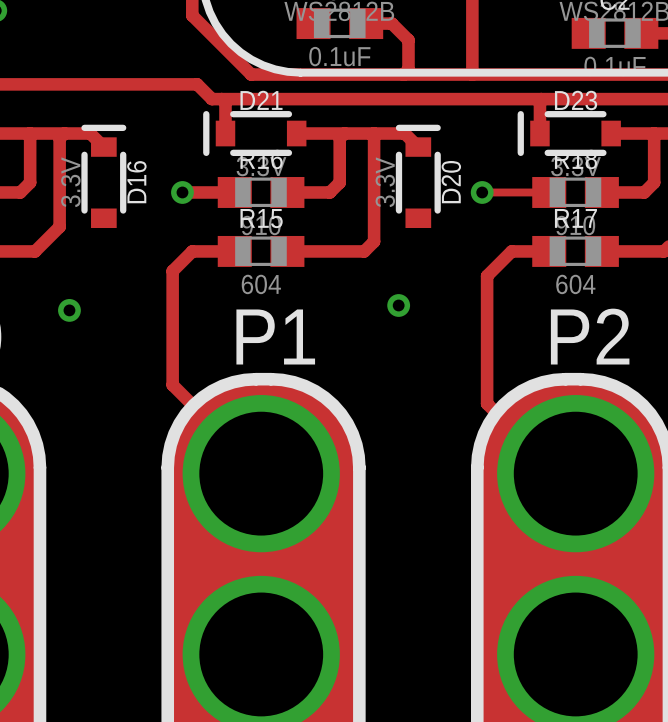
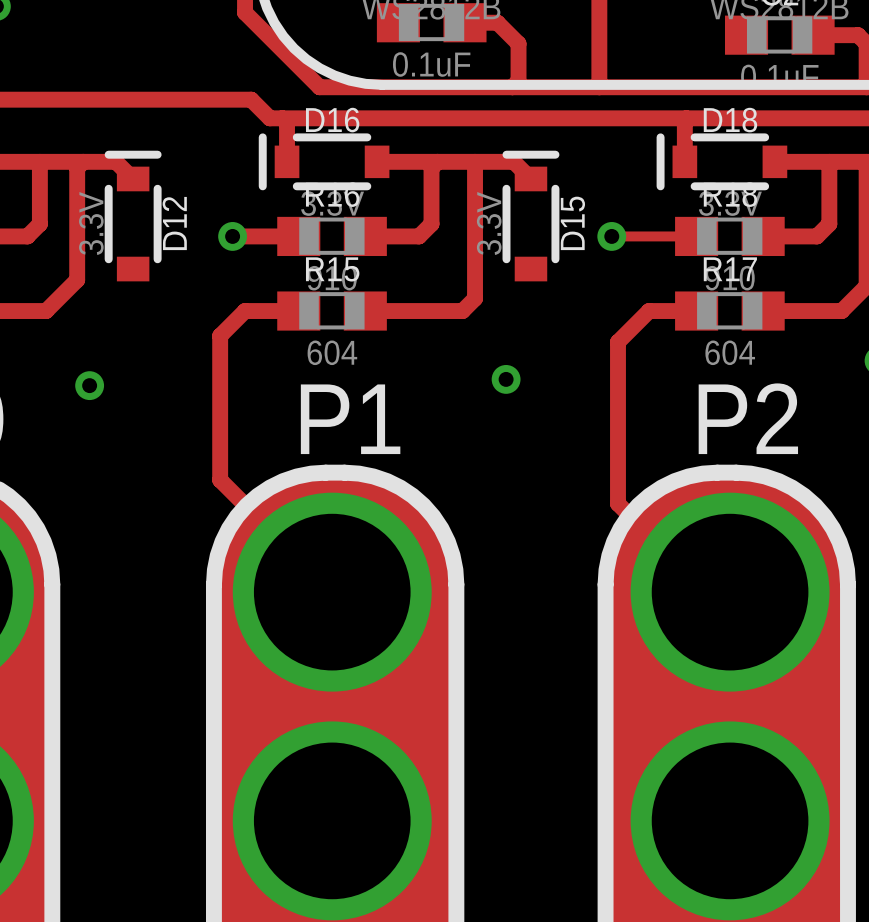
D21 name: D21 (261, 100) -> D16 (332, 120)
D23 name: D23 (576, 100) -> D18 (730, 120)
D16 name: D16 (136, 182) -> D12 (174, 223)
D20 name: D20 (451, 182) -> D15 (572, 223)

